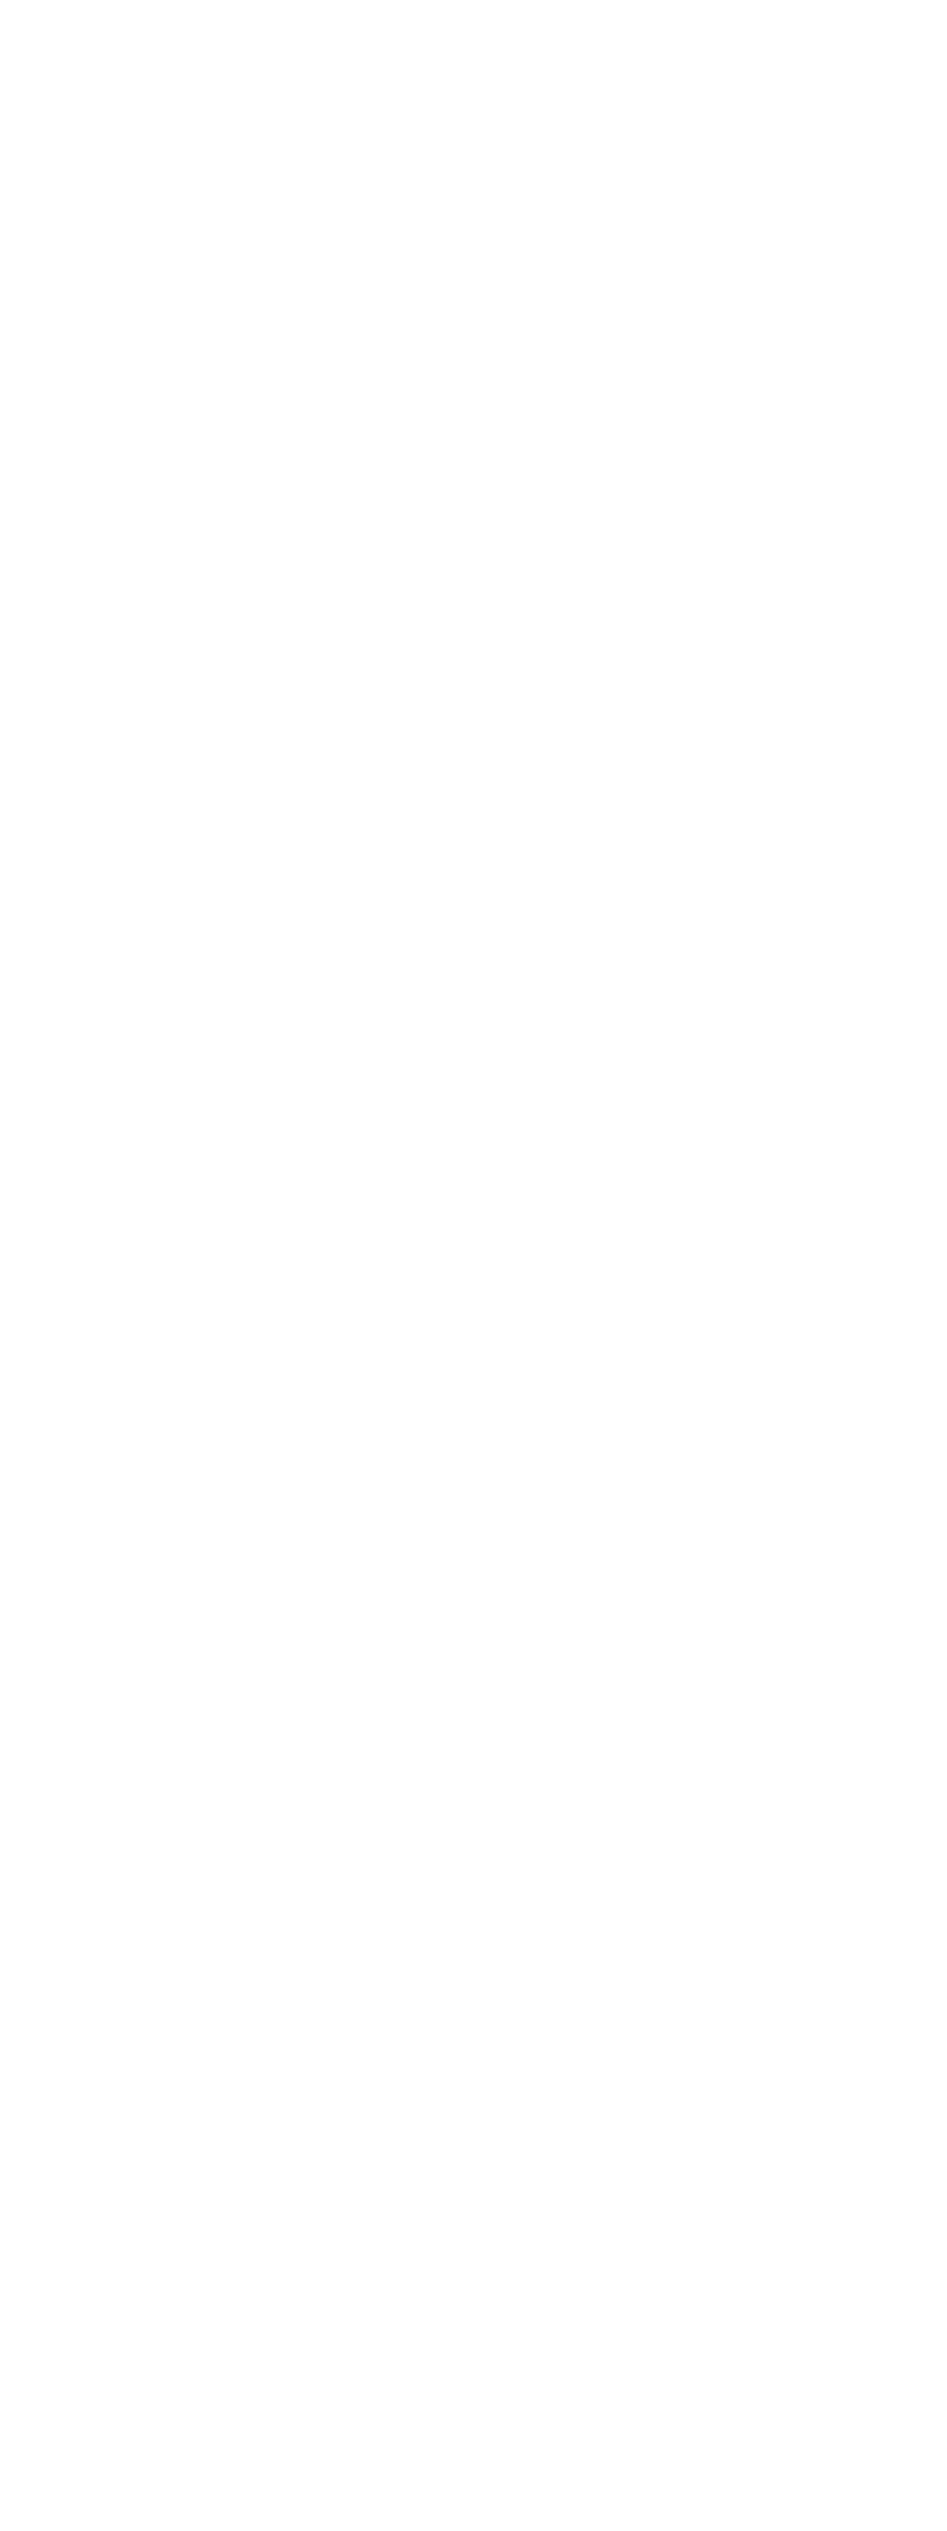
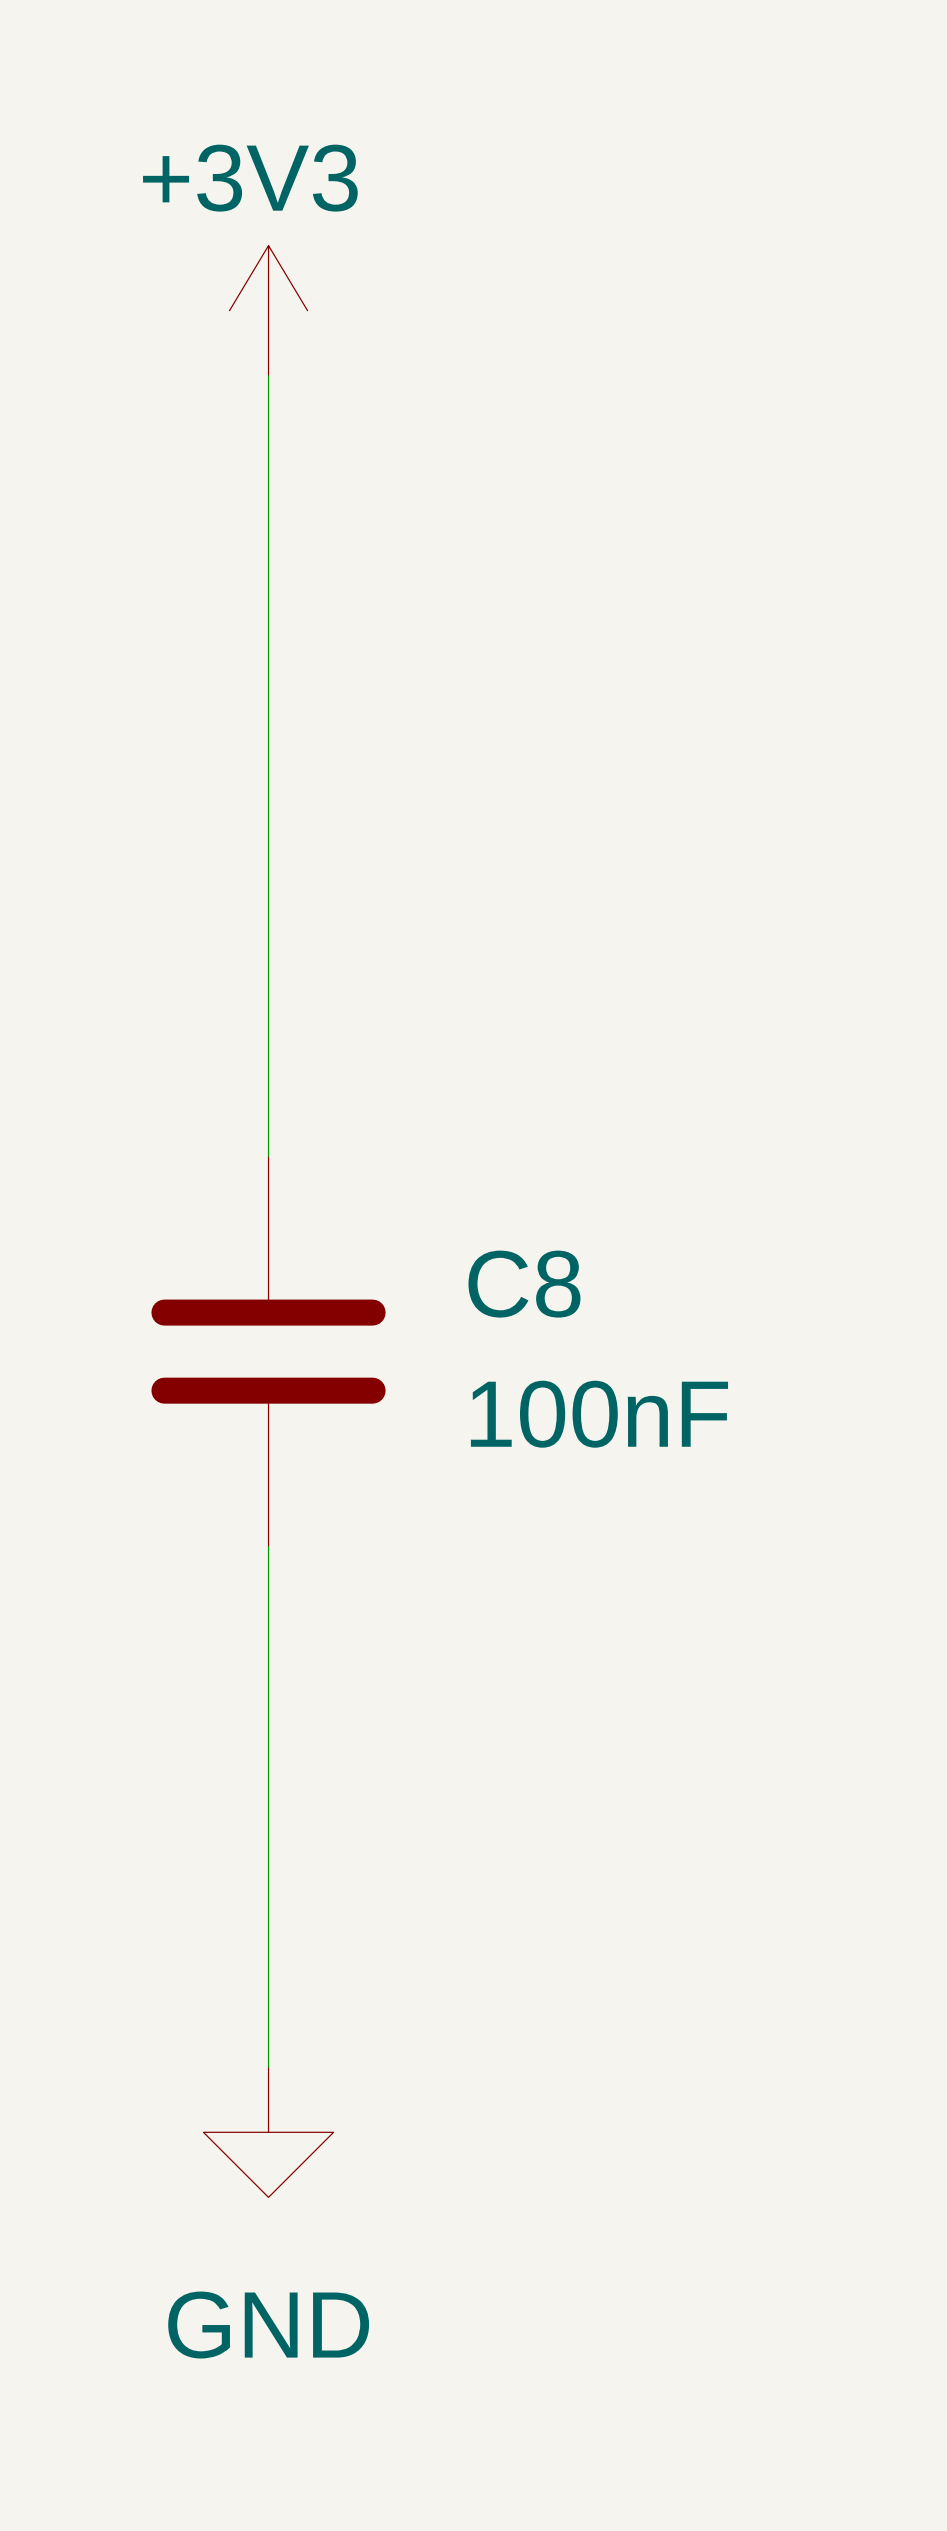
power symbol: none -> +3V3 (268, 310)
wire: none -> (268, 375) (268, 1156)
C8: none -> 100nF (268, 1351)
wire: none -> (268, 1546) (268, 2067)
power symbol: none -> GND (268, 2132)

